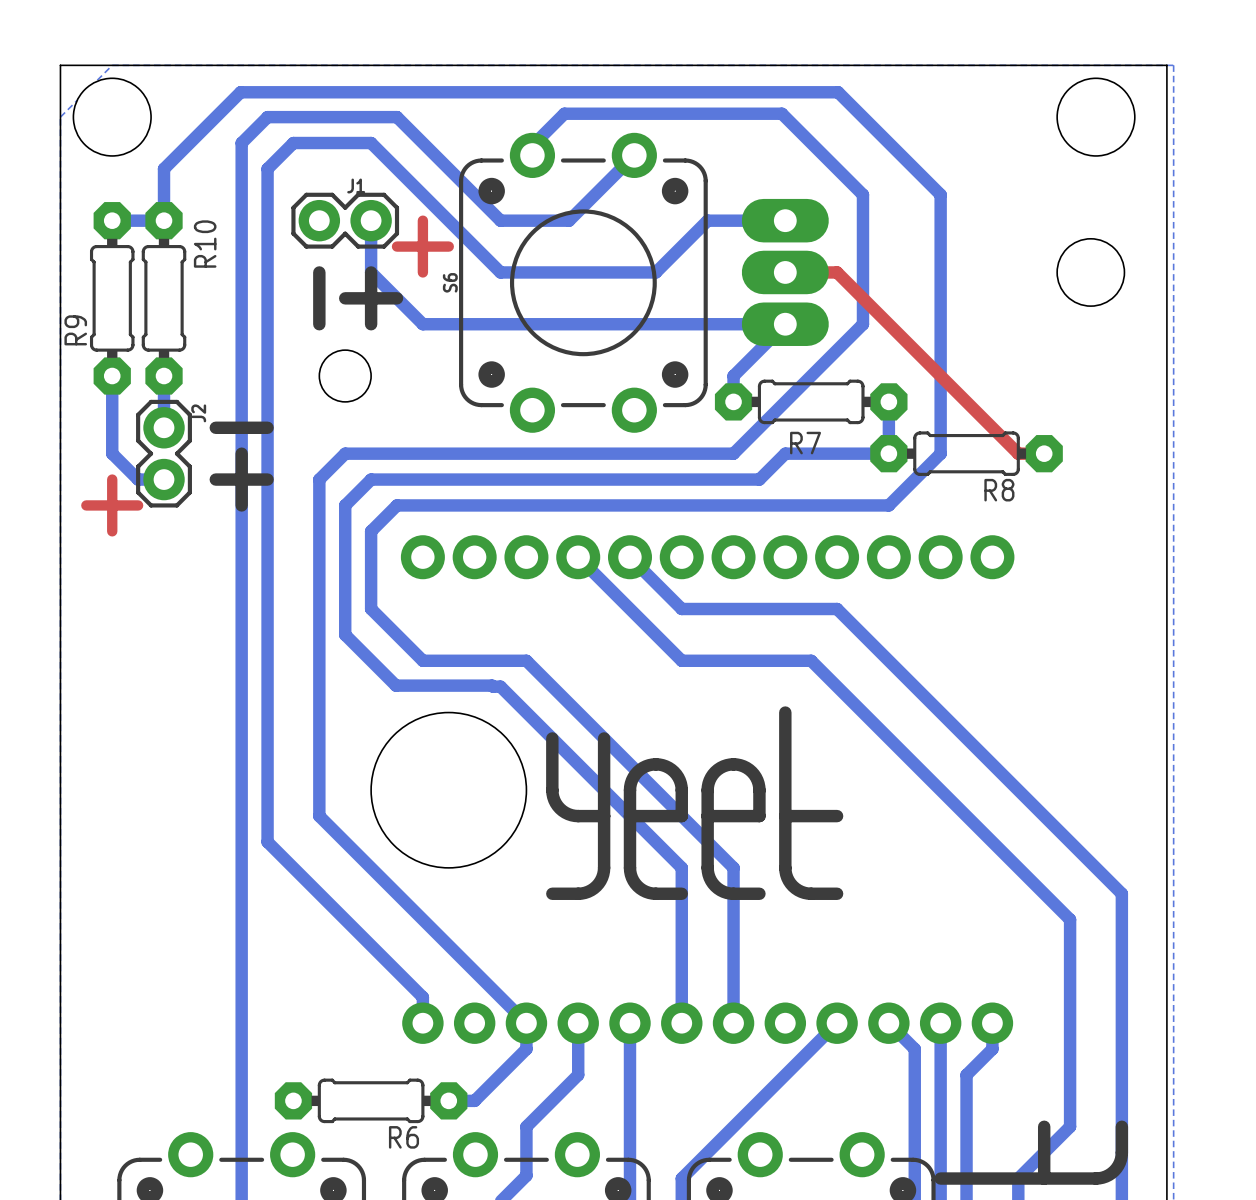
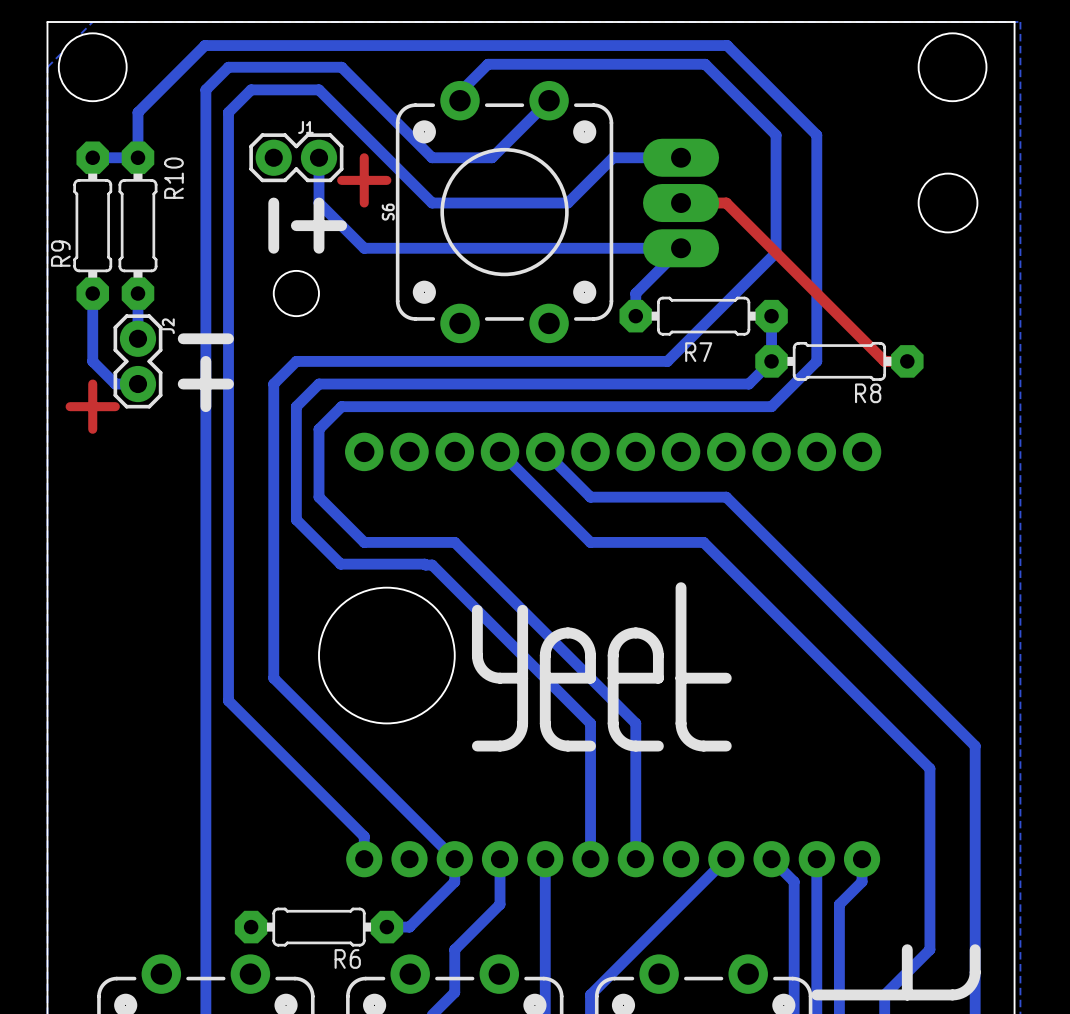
bottom track: (781, 113) (862, 194) (862, 324) (733, 453) -> (678, 64) (705, 64) (776, 135) (776, 252) (667, 361) (635, 361)
bottom track: (888, 453) (785, 453) (759, 479) -> (771, 361) (748, 384) (658, 384)

